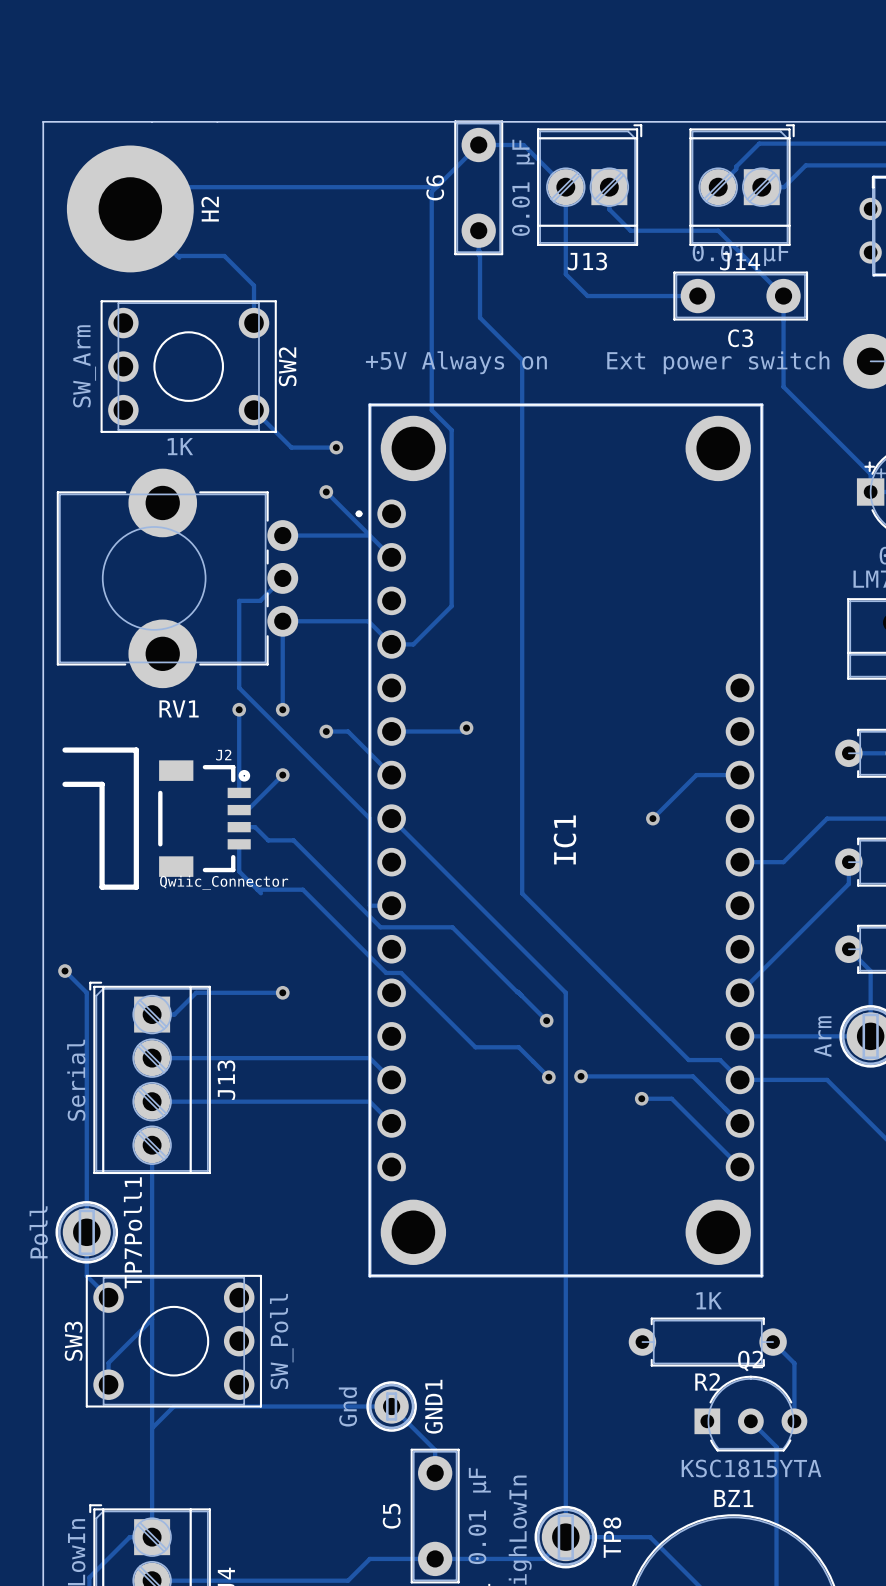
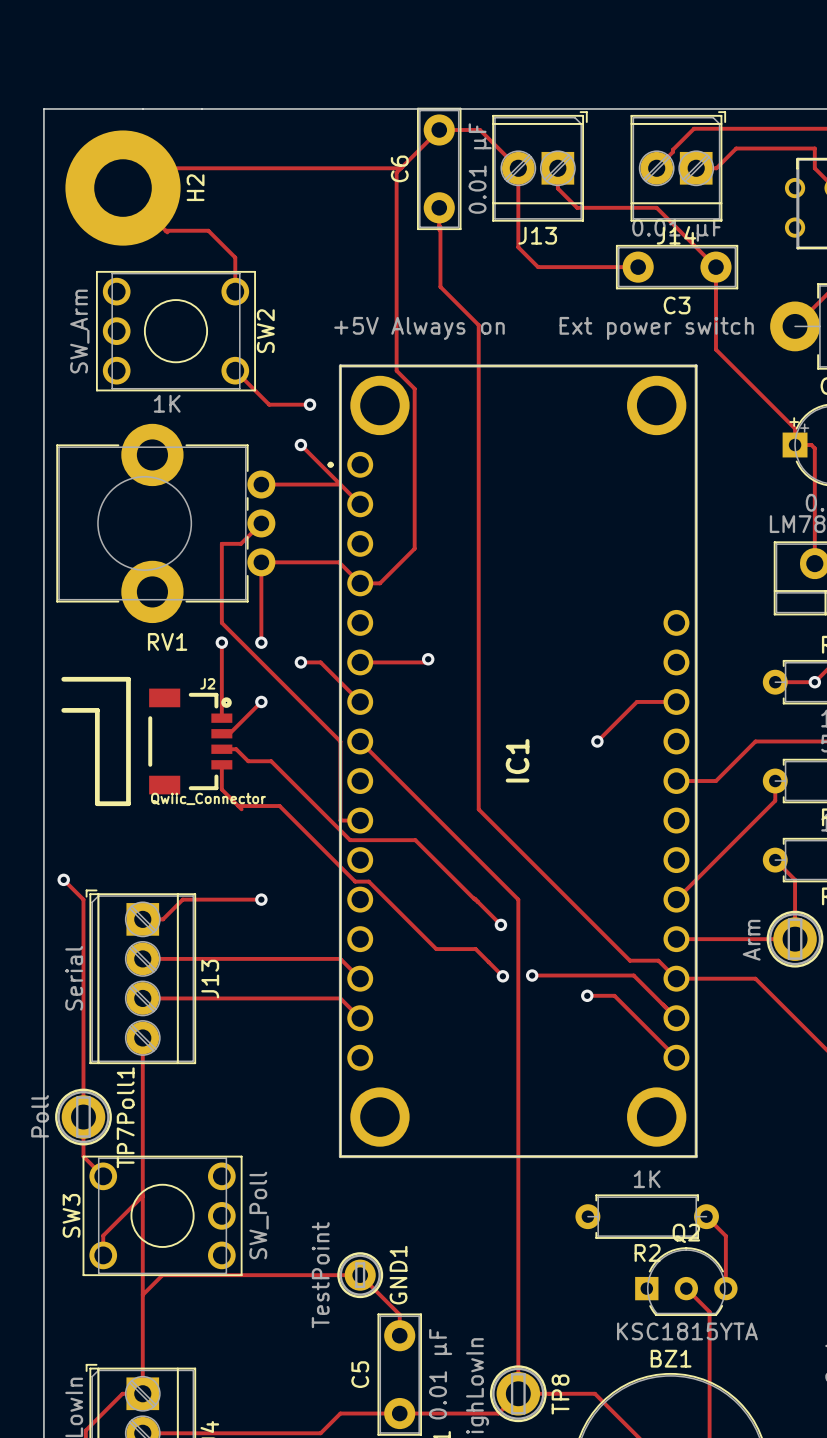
GND1 value: Gnd (347, 1407) -> TestPoint (320, 1275)

